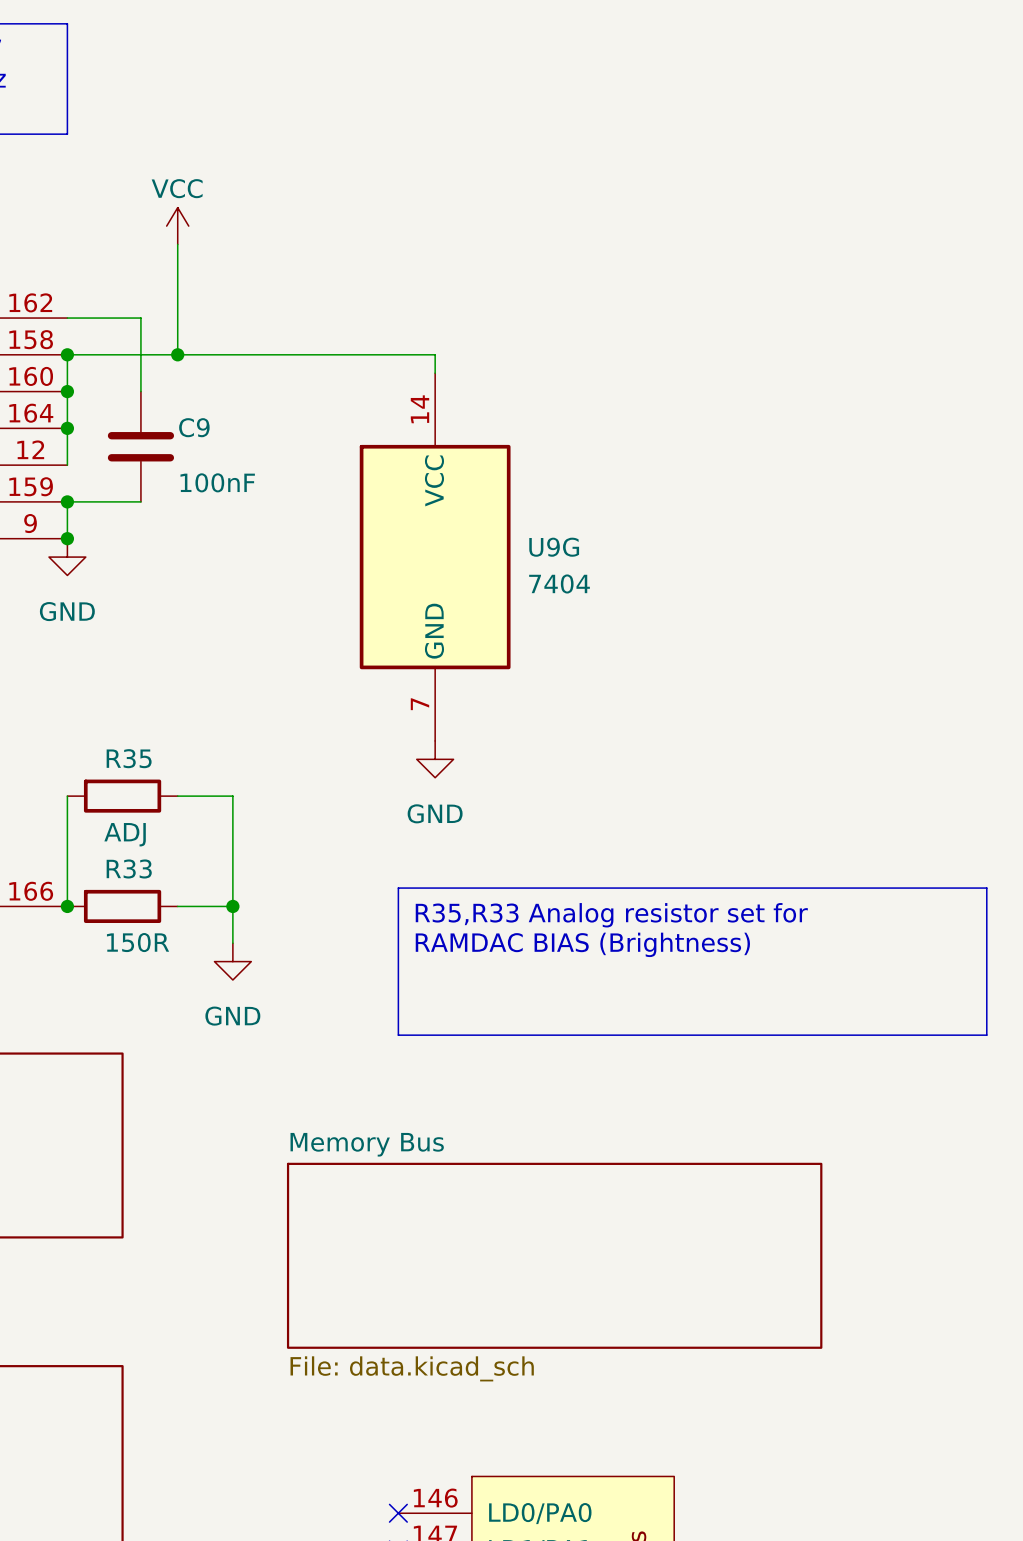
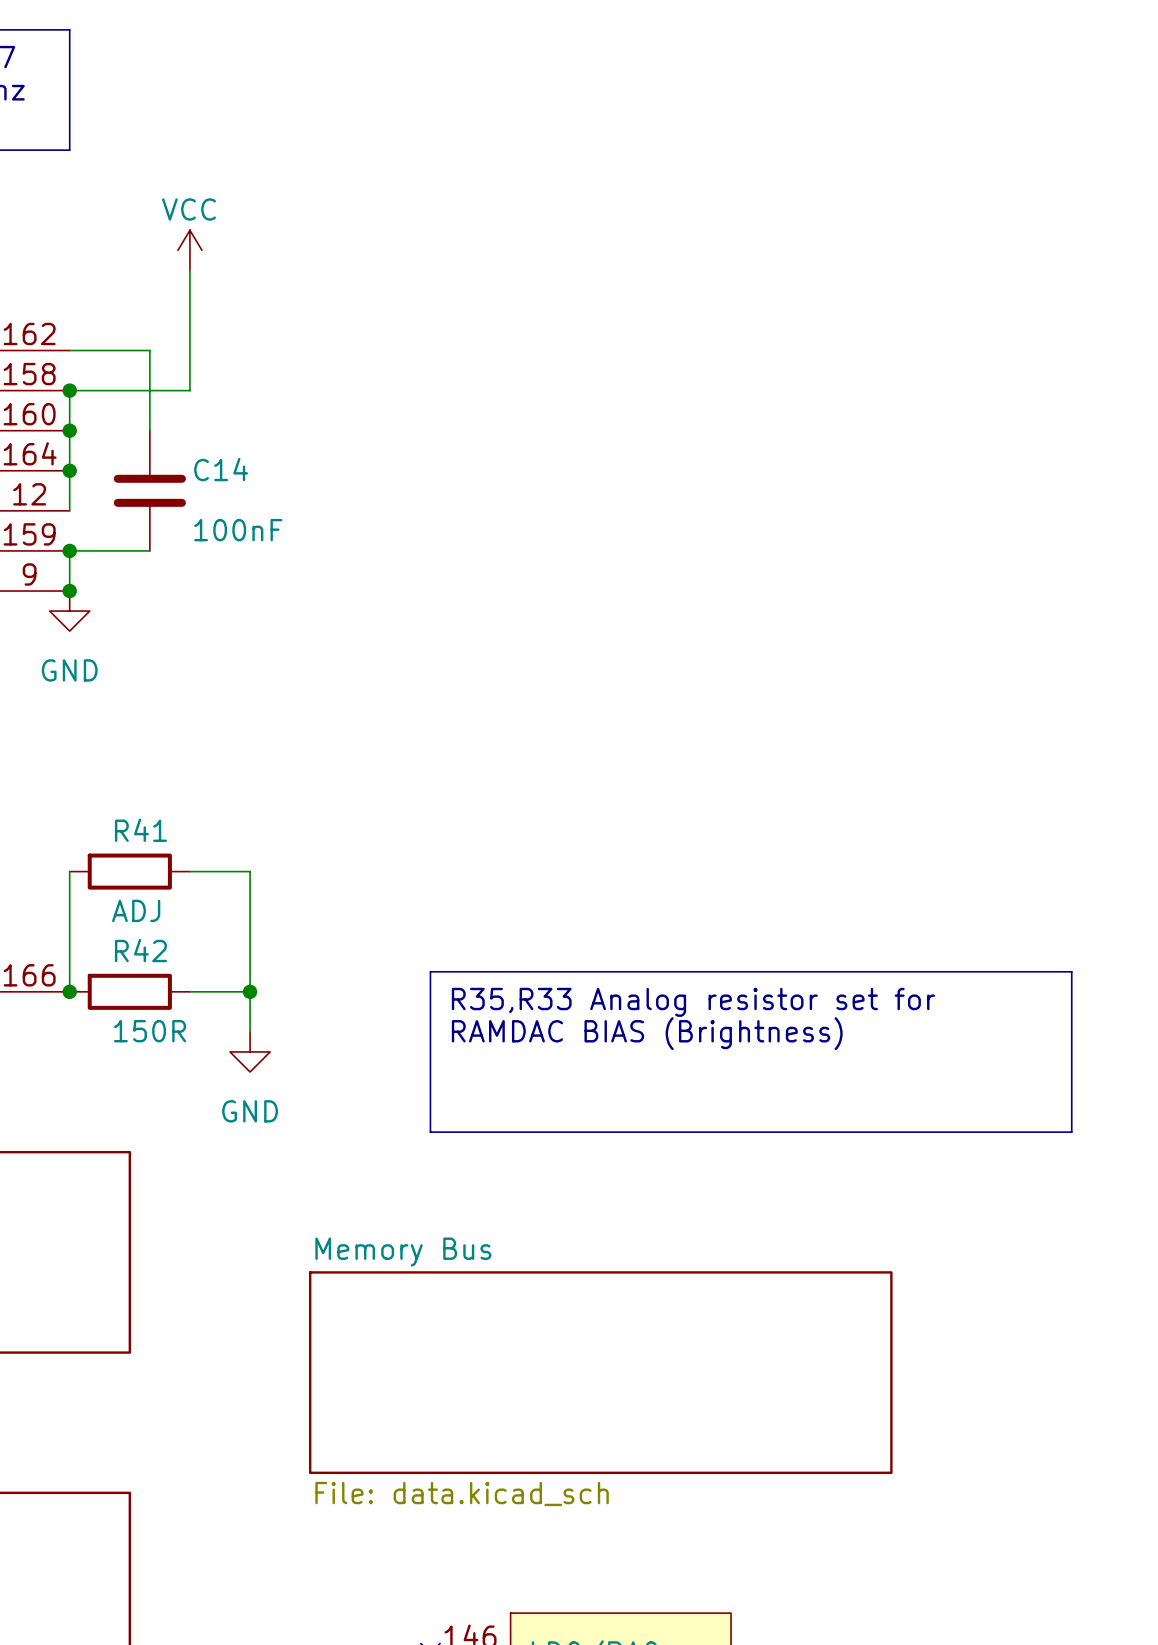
wire: (177, 354) (435, 354) (435, 373) -> none
junction: (177, 354) -> none
C9 name: C9 (194, 427) -> C14 (221, 469)
U9G: 7404 (435, 557) -> none
R35 name: R35 (129, 758) -> R41 (140, 830)
power symbol: GND (435, 759) -> none
R33 name: R33 (129, 868) -> R42 (140, 950)

